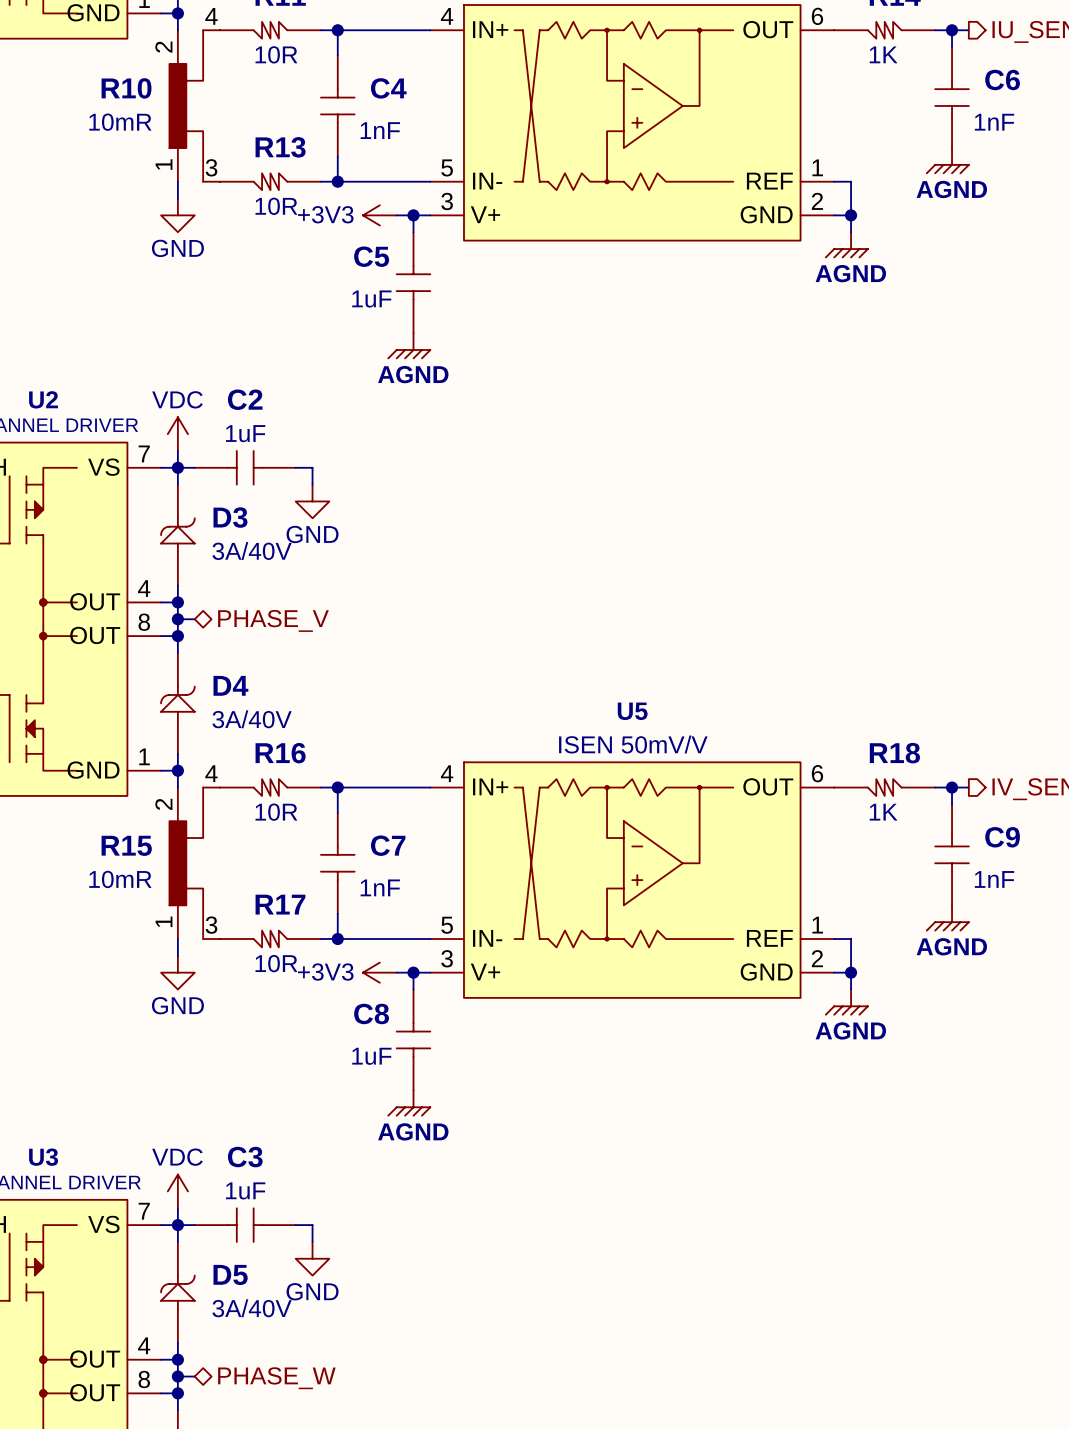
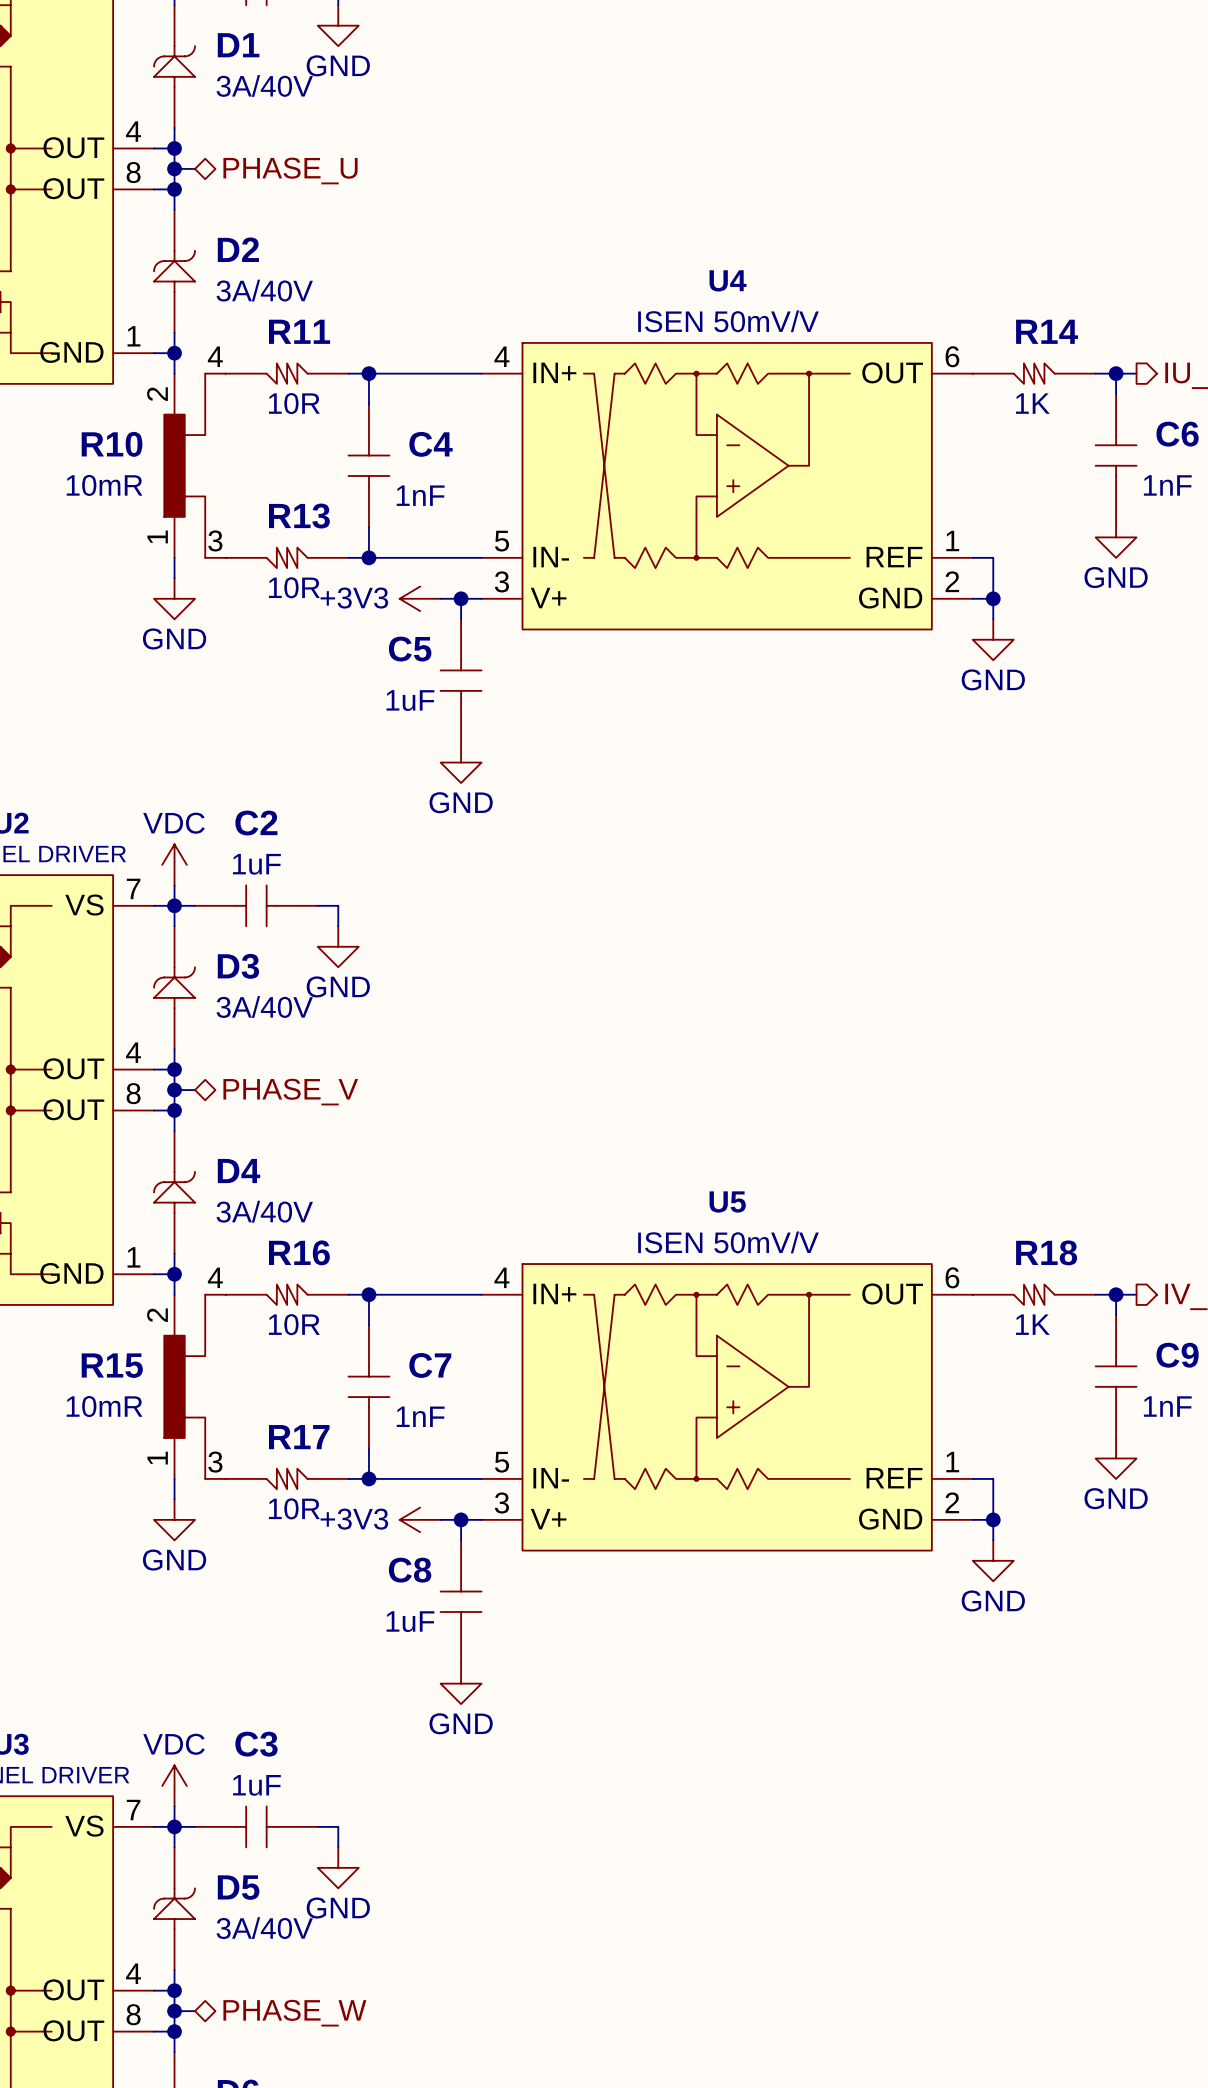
power symbol: AGND (947, 160) -> GND (1116, 537)
power symbol: AGND (846, 244) -> GND (993, 639)
power symbol: AGND (409, 345) -> GND (461, 762)
power symbol: AGND (947, 917) -> GND (1116, 1458)
power symbol: AGND (846, 1002) -> GND (993, 1560)
power symbol: AGND (409, 1103) -> GND (461, 1683)

